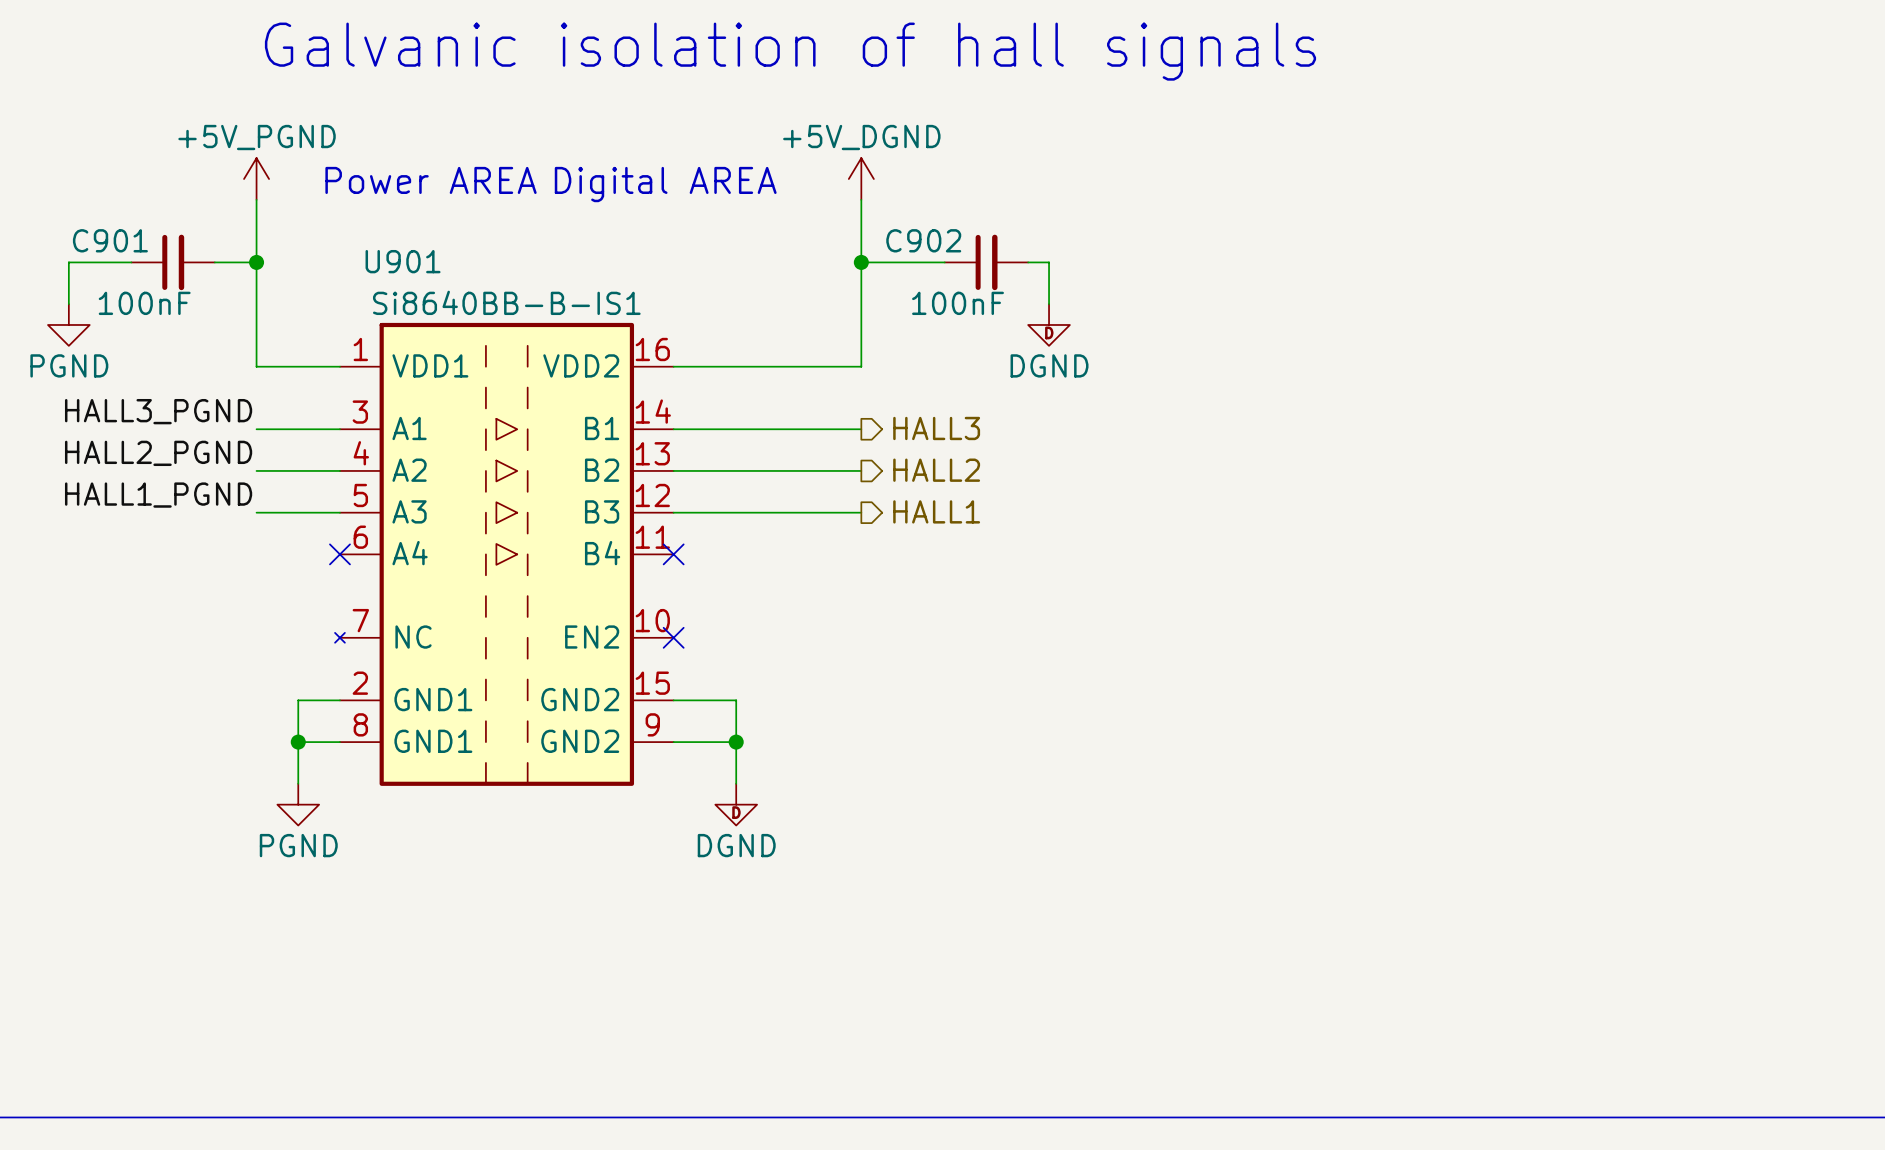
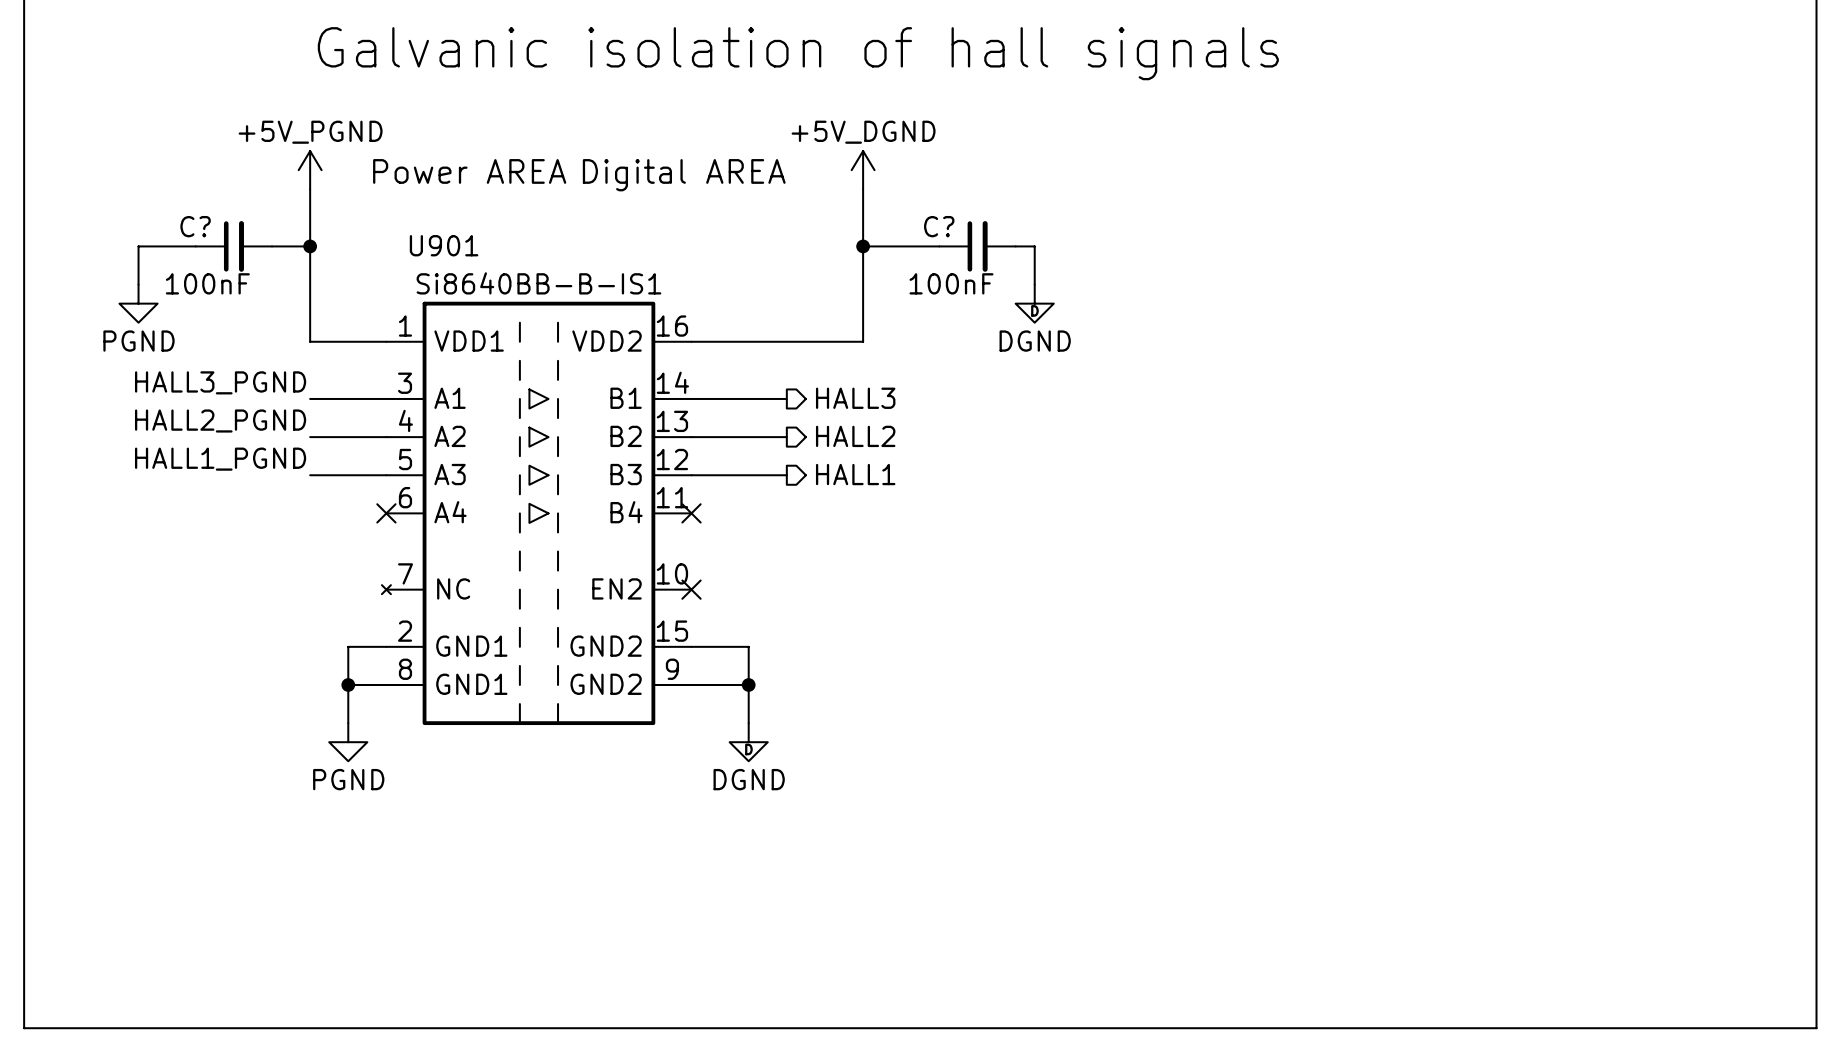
C901 name: C901 (110, 240) -> C? (195, 226)
C902 name: C902 (923, 240) -> C? (939, 226)
hierarchical label position: HALL3 (936, 428) -> HALL3 (855, 398)
wire: (777, 429) (861, 429) -> none
wire: (777, 470) (861, 470) -> none
hierarchical label position: HALL2 (936, 470) -> HALL2 (855, 436)
hierarchical label position: HALL1 (936, 511) -> HALL1 (855, 474)
wire: (777, 512) (861, 512) -> none

